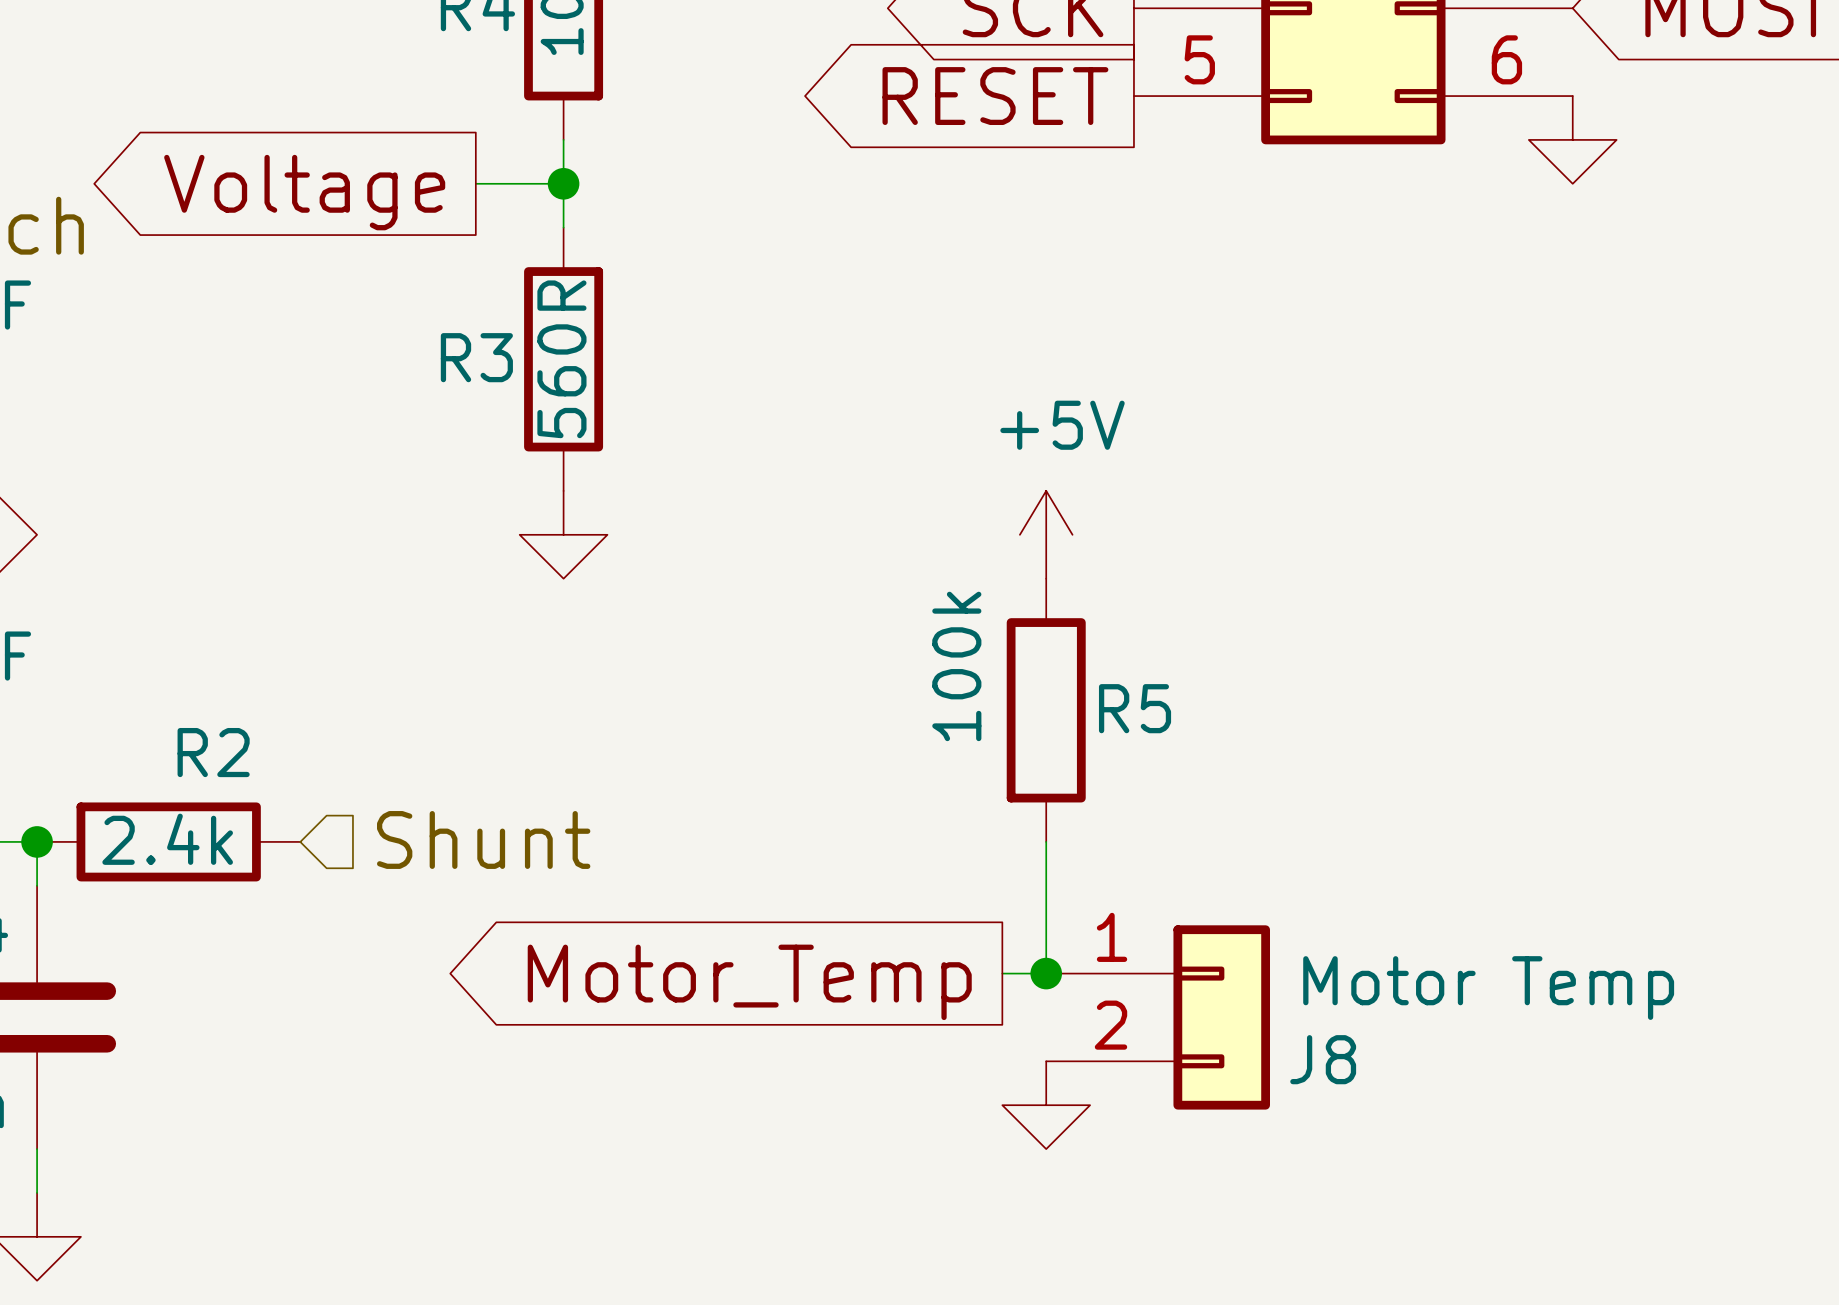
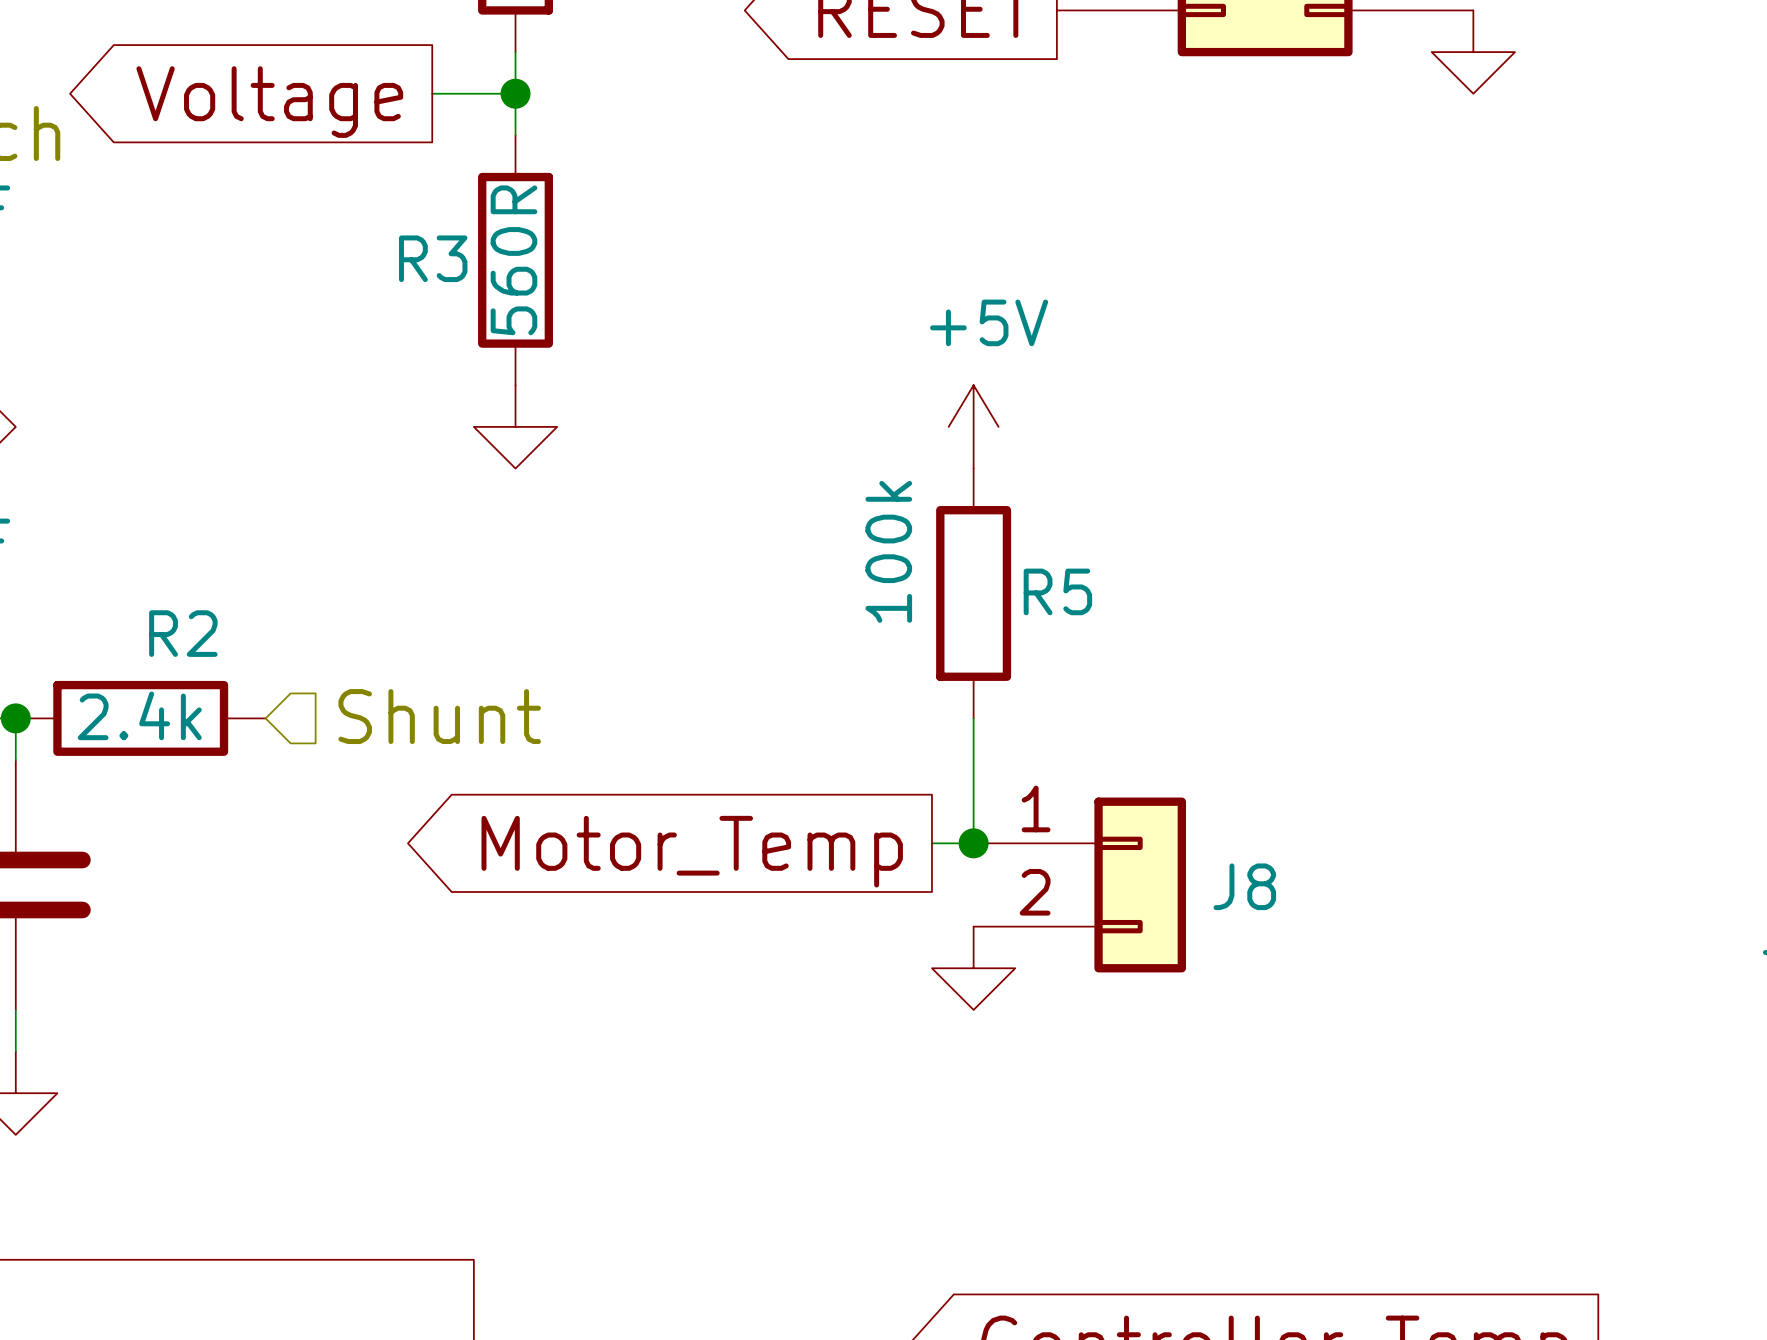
J8 value: Motor Temp (1488, 988) -> none
J8 name position: J8 (1323, 1059) -> J8 (1244, 886)

